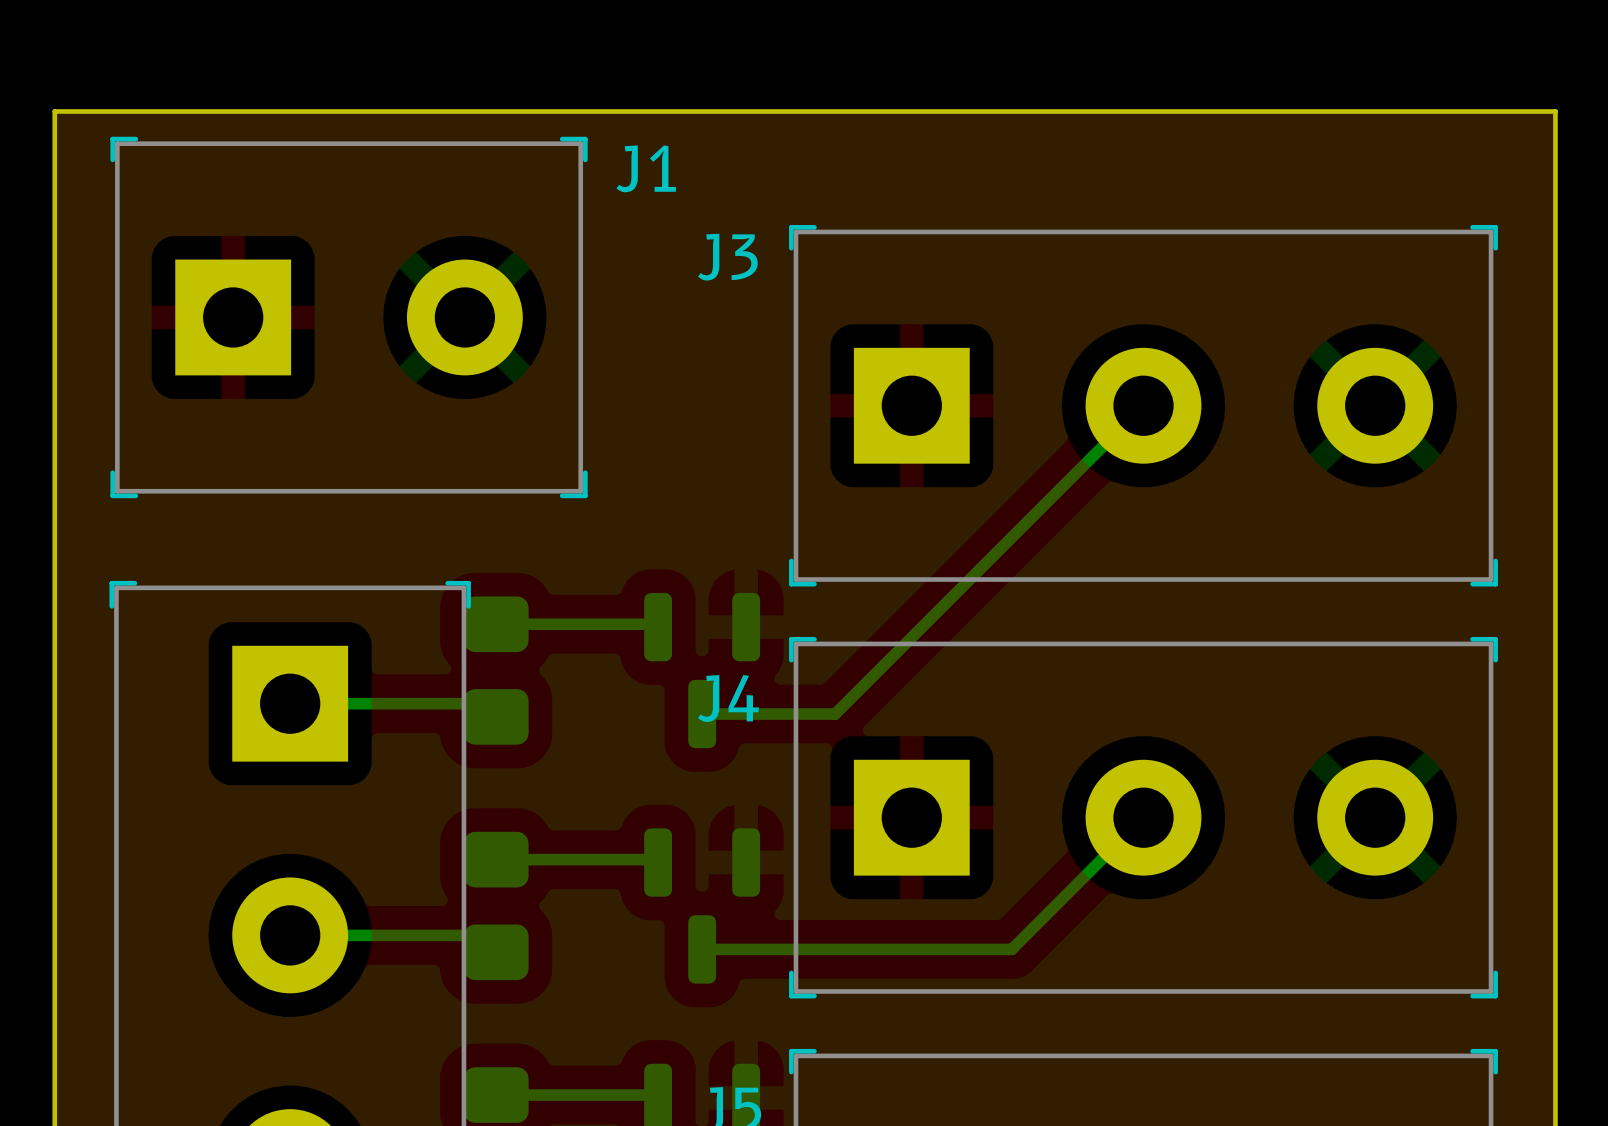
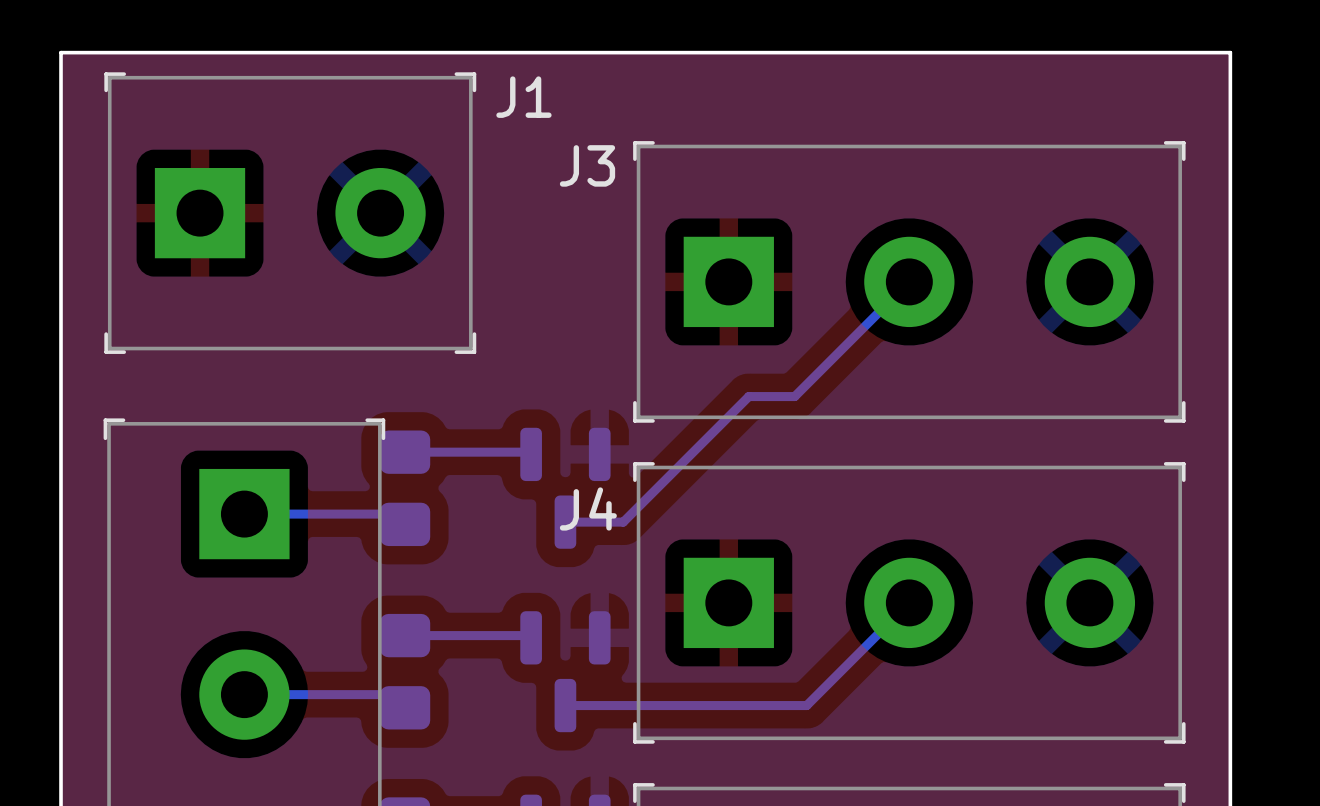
bottom track: (996, 552) (835, 714) (776, 714) -> (794, 396) (748, 396) (623, 522)

